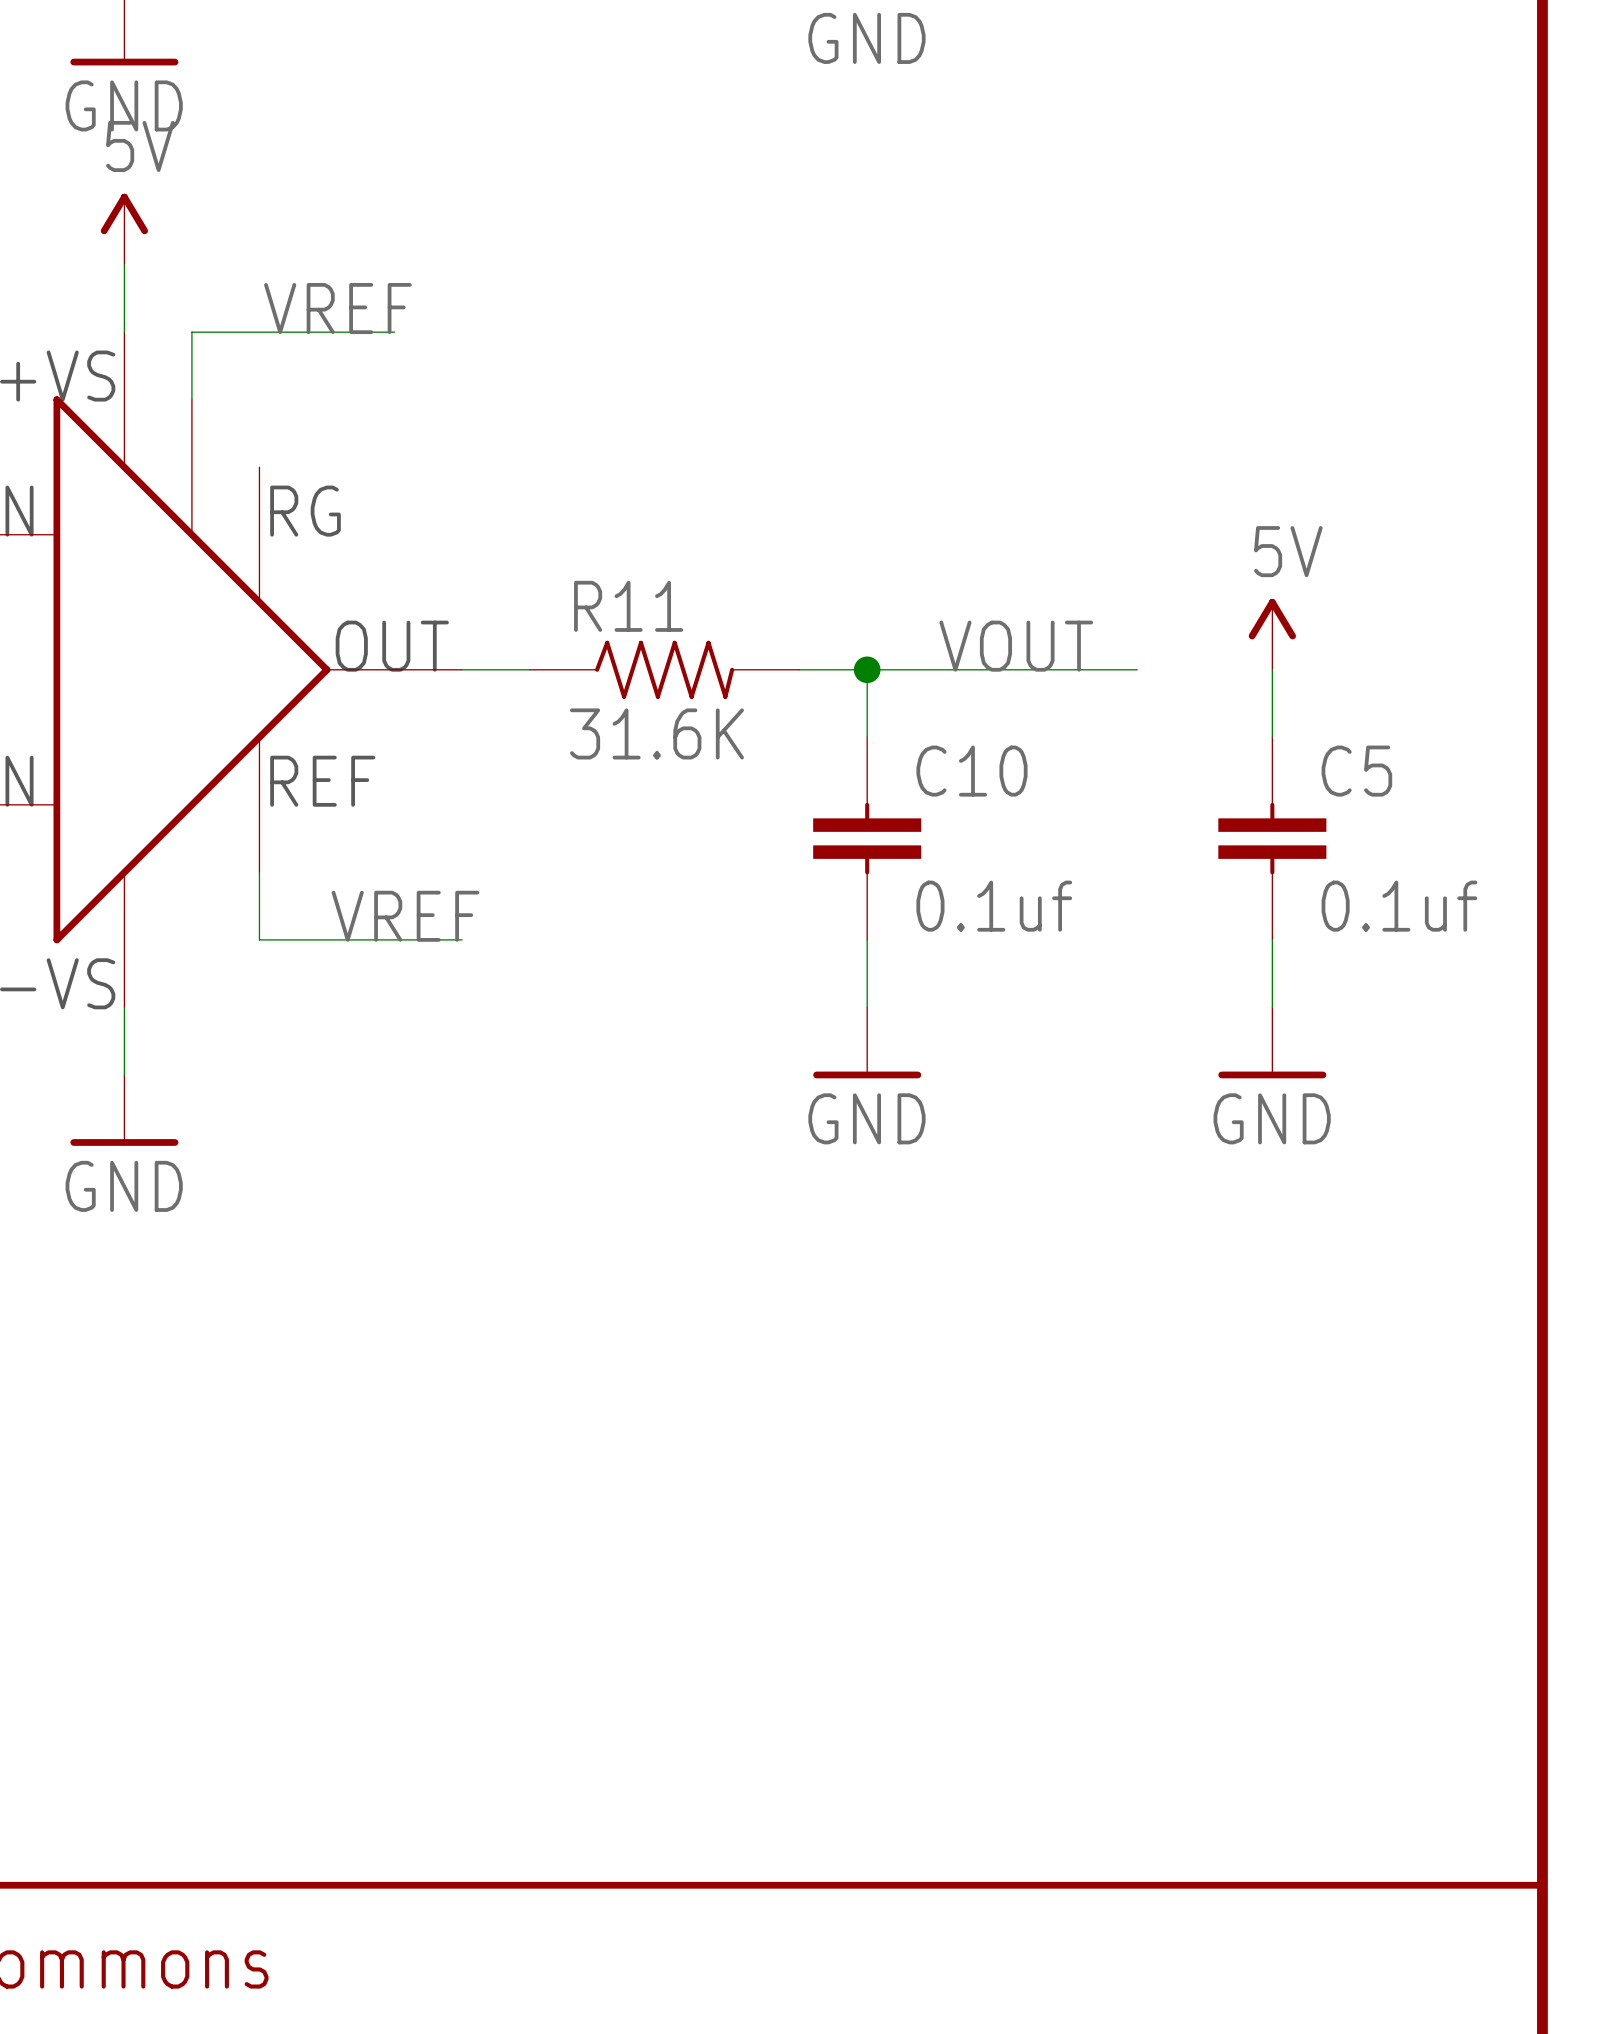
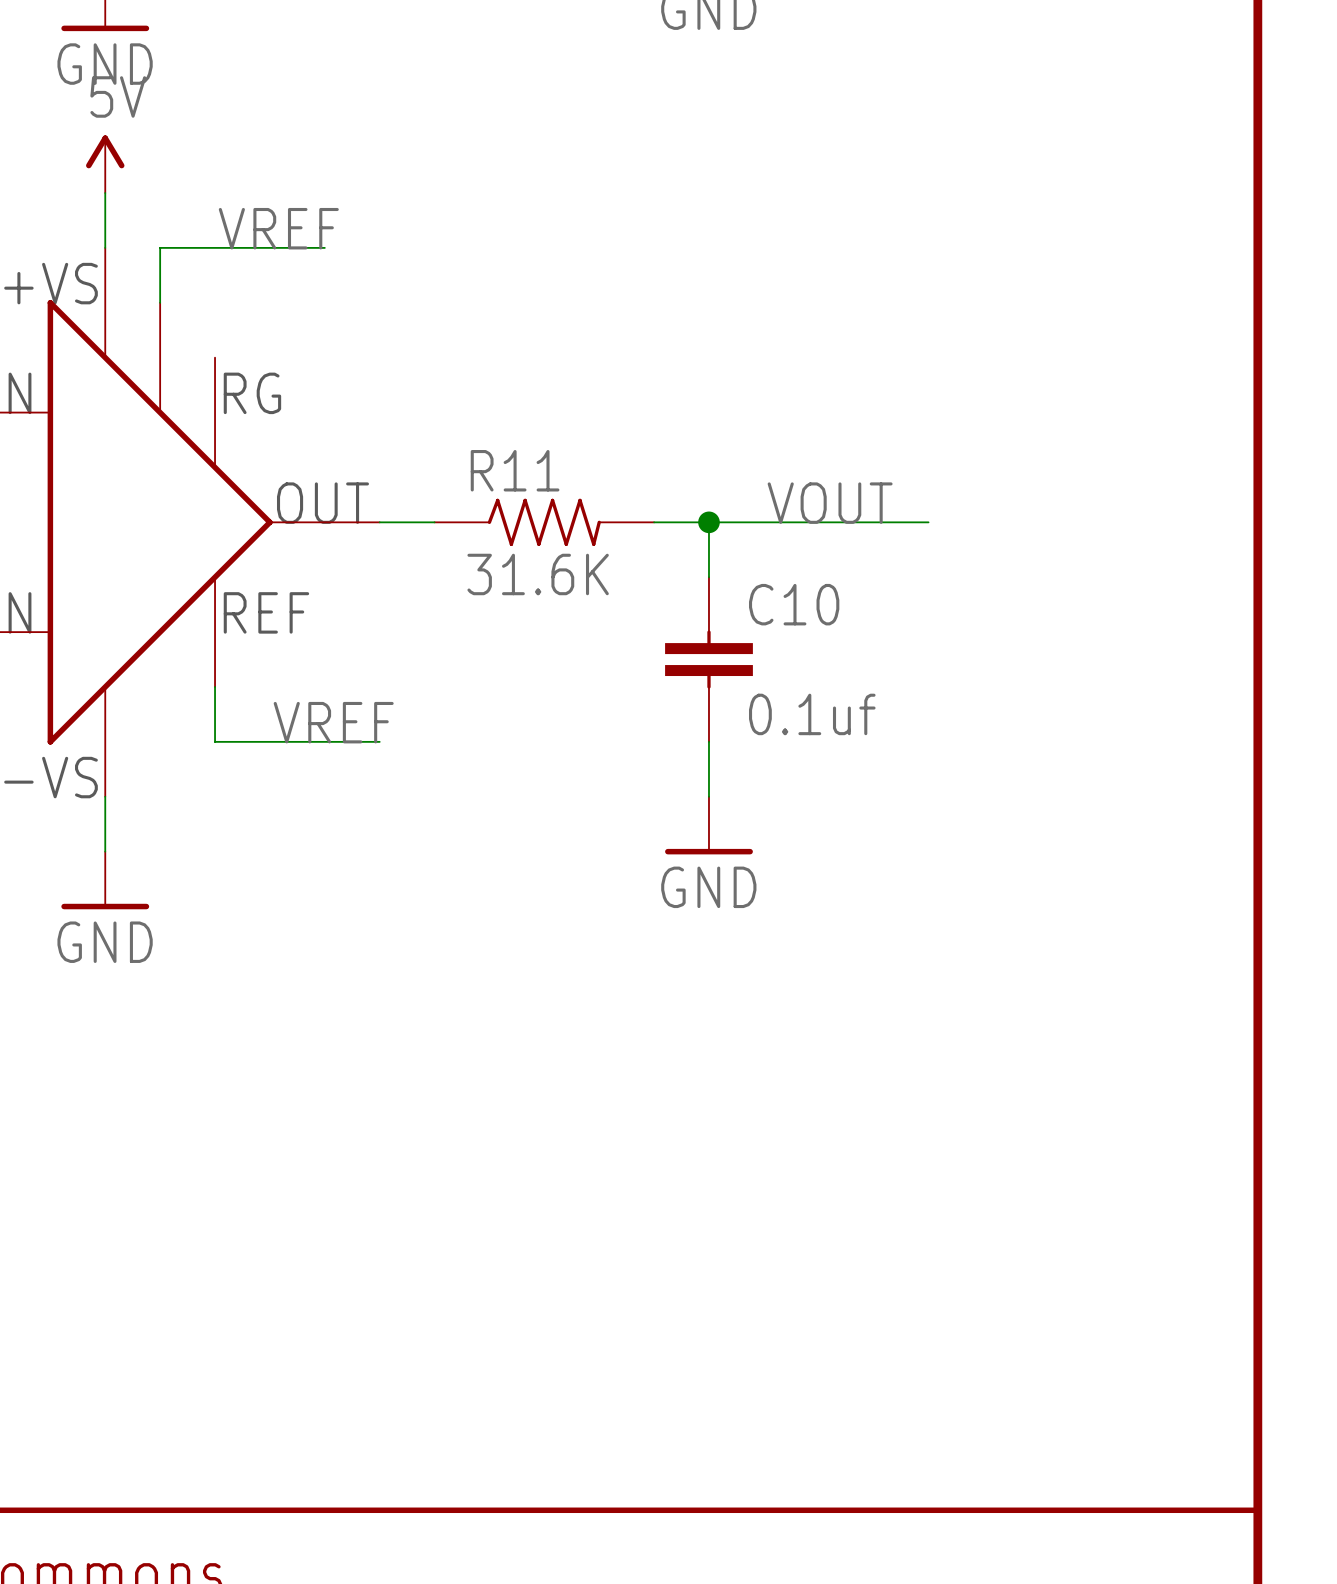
power symbol: 5V (1272, 634) -> none
wire: (1272, 669) (1272, 737) -> none
C5: 0.1uf (1272, 838) -> none
wire: (1272, 939) (1272, 1007) -> none
power symbol: GND (1272, 1042) -> none

